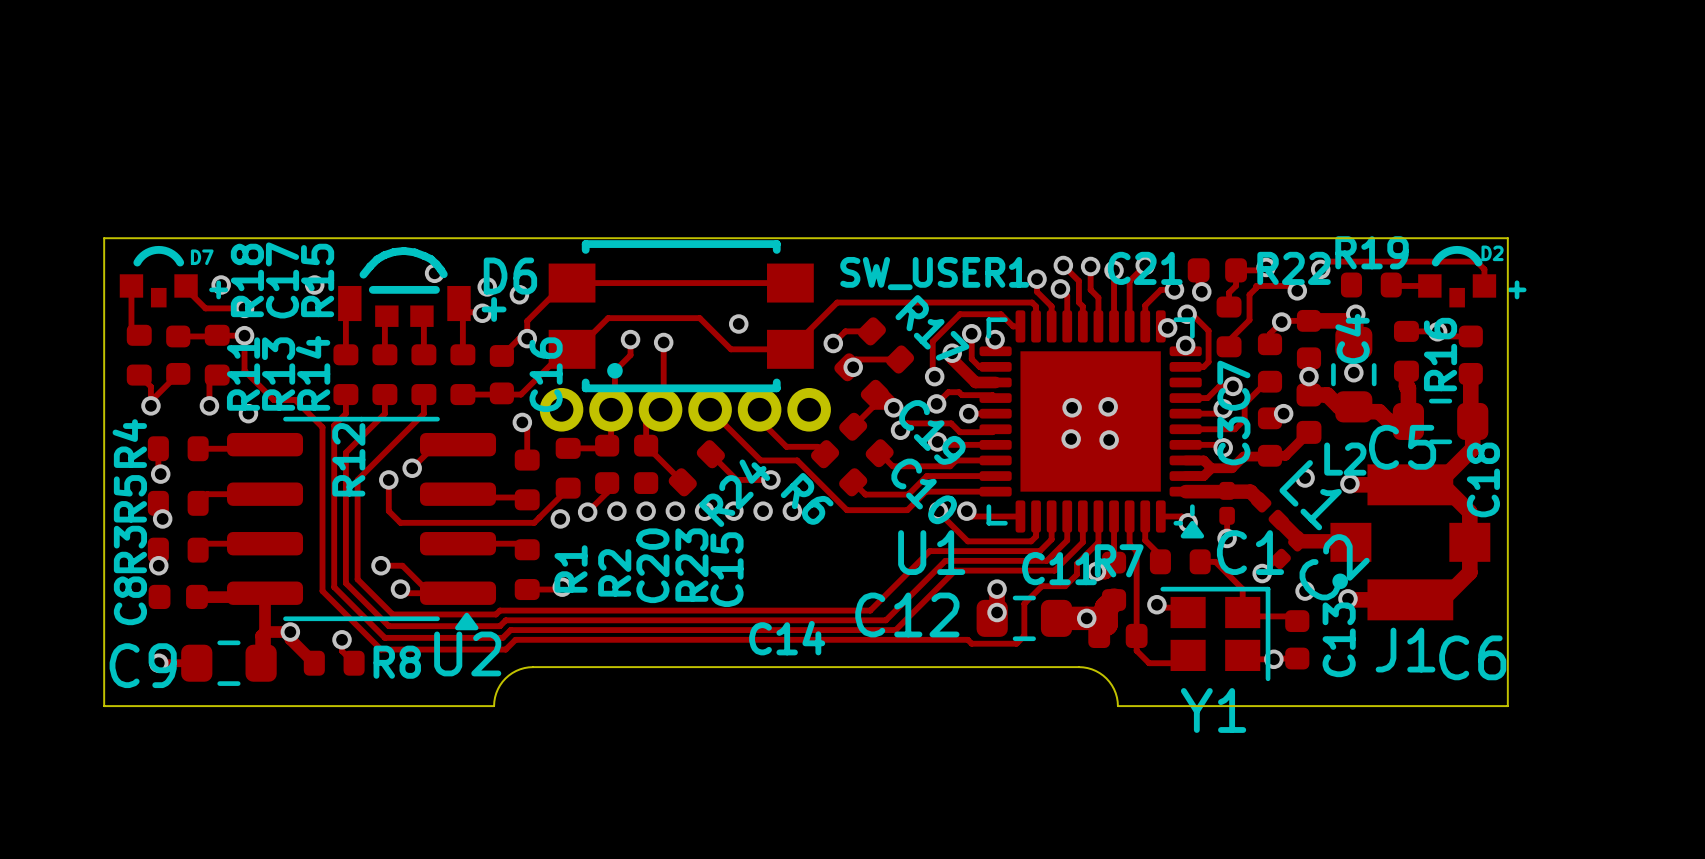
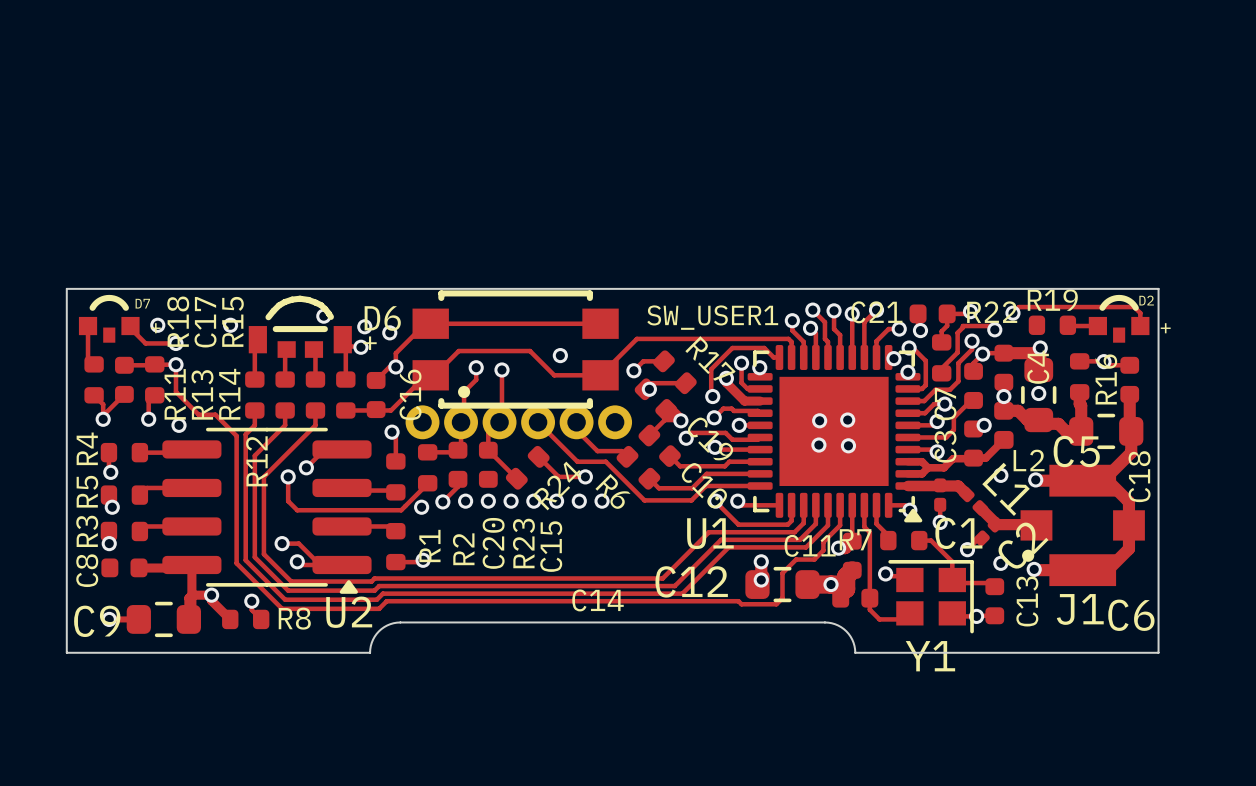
track: none -> (972, 341) (972, 349) (958, 363) (958, 381) (950, 389) (935, 389) (924, 401) (907, 401)
via: none -> (972, 341)

